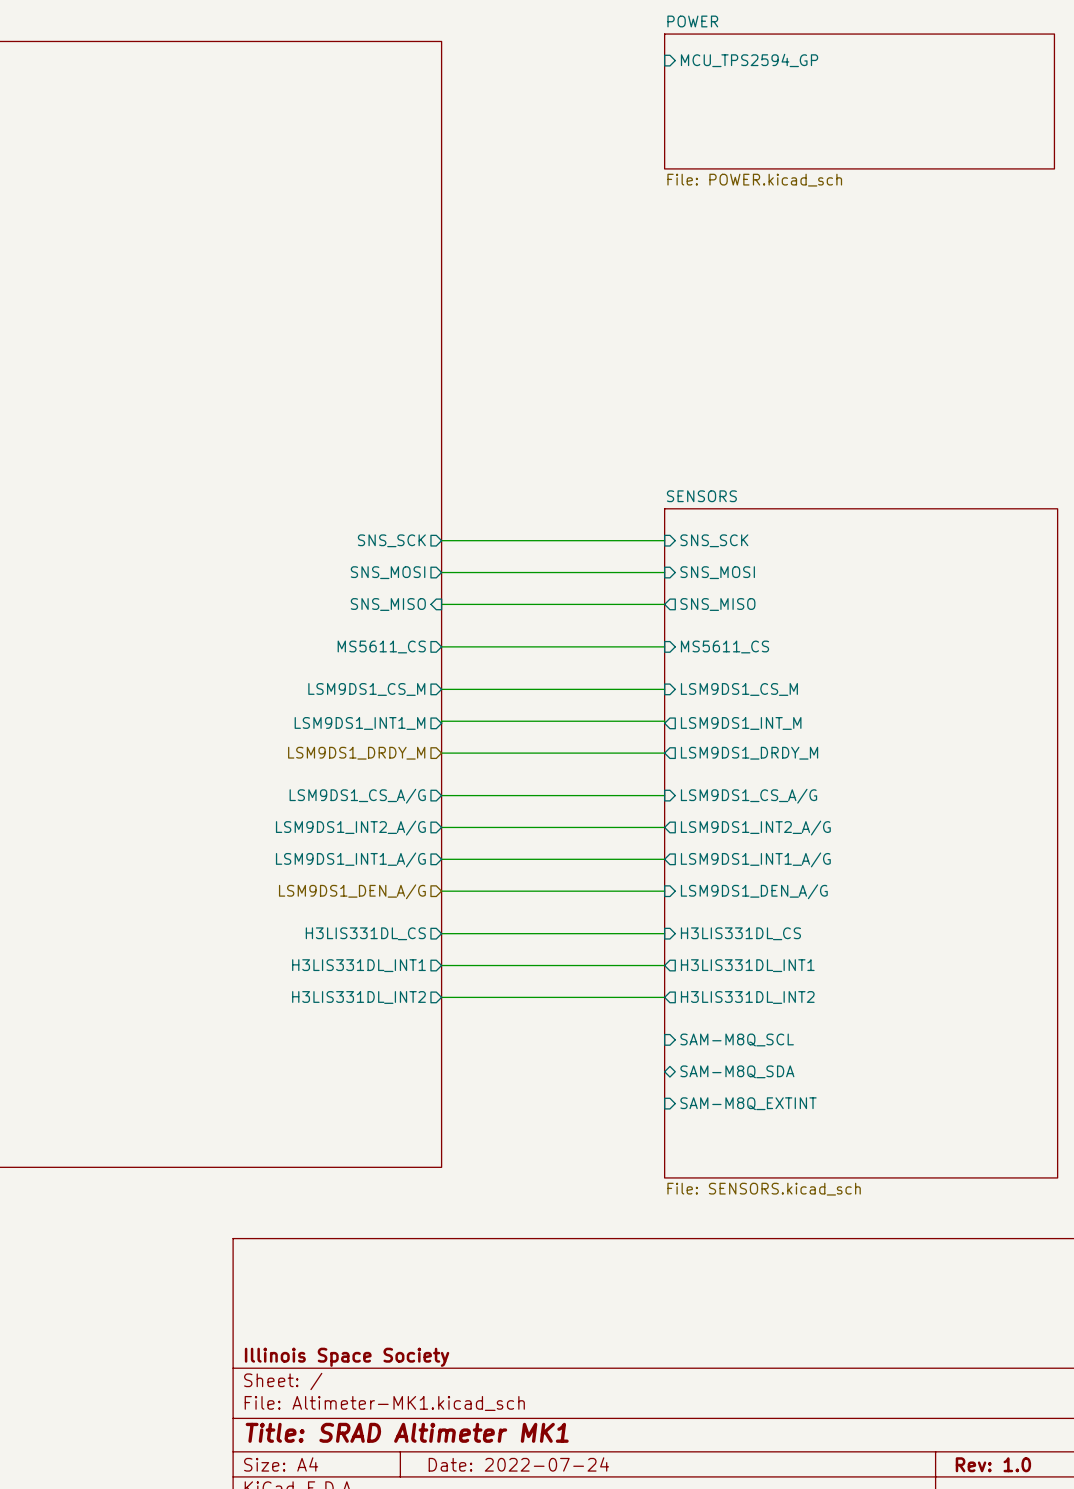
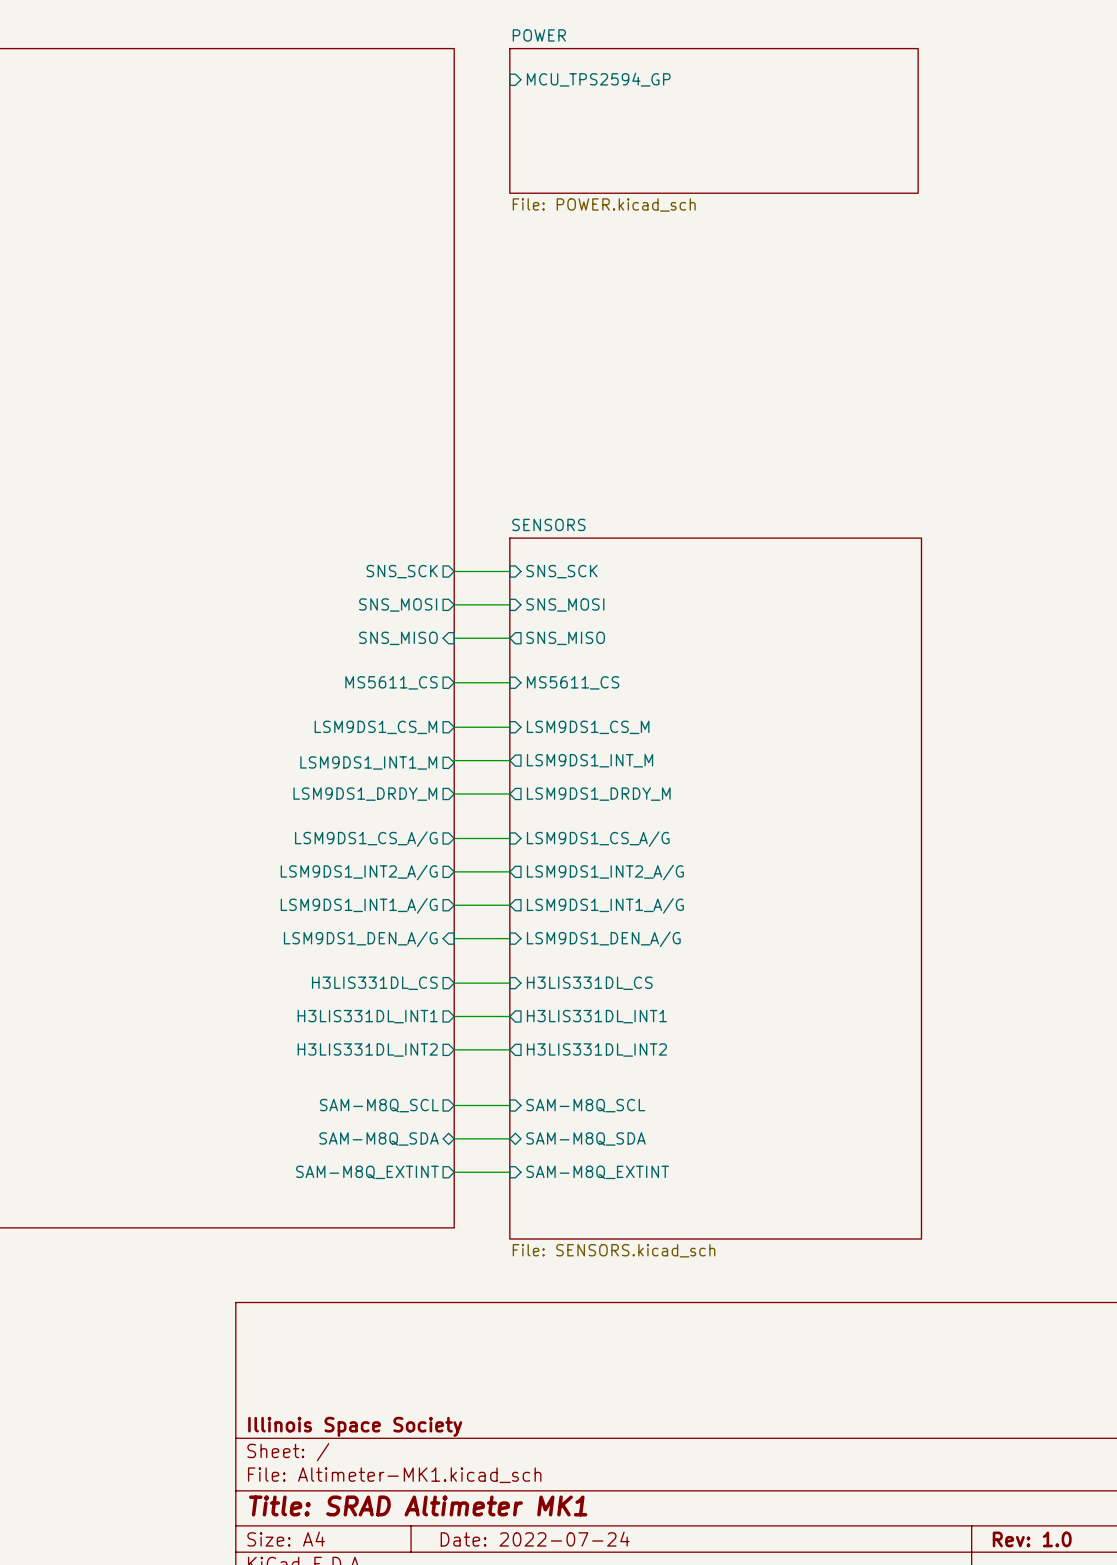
sheet pin position: MCU_TPS2594_GP (749, 60) -> MCU_TPS2594_GP (598, 79)
sheet POWER: File: POWER.kicad_sch (859, 101) -> none
sheet POWER: none -> File: POWER.kicad_sch (713, 120)
wire: (494, 540) (664, 540) -> none
sheet pin position: SNS_SCK (714, 540) -> SNS_SCK (561, 571)
wire: (494, 572) (664, 572) -> none
sheet pin position: SNS_MOSI (717, 572) -> SNS_MOSI (565, 604)
wire: (494, 604) (664, 604) -> none
sheet pin position: SNS_MISO (717, 604) -> SNS_MISO (565, 638)
wire: (494, 646) (664, 646) -> none
sheet pin position: MS5611_CS (724, 646) -> MS5611_CS (573, 682)
wire: (494, 689) (664, 689) -> none
sheet pin position: LSM9DS1_CS_M (739, 689) -> LSM9DS1_CS_M (588, 727)
wire: (494, 721) (664, 721) (664, 723) -> none
sheet pin position: LSM9DS1_INT_M (741, 723) -> LSM9DS1_INT_M (590, 760)
hierarchical label: LSM9DS1_DRDY_M (356, 753) -> none
sheet pin: none -> LSM9DS1_DRDY_M (365, 794)
wire: (494, 753) (664, 753) -> none
sheet pin: none -> LSM9DS1_DRDY_M (598, 794)
sheet pin: LSM9DS1_DRDY_M (749, 753) -> none
wire: (494, 795) (664, 795) -> none
sheet pin position: LSM9DS1_CS_A/G (749, 796) -> LSM9DS1_CS_A/G (598, 839)
wire: (494, 827) (664, 827) -> none
sheet pin position: LSM9DS1_INT2_A/G (755, 828) -> LSM9DS1_INT2_A/G (605, 872)
sheet SENSORS position: (861, 843) -> (715, 888)
wire: (494, 859) (664, 859) -> none
sheet pin position: LSM9DS1_INT1_A/G (755, 859) -> LSM9DS1_INT1_A/G (605, 905)
hierarchical label: LSM9DS1_DEN_A/G (352, 891) -> none
sheet pin: none -> LSM9DS1_DEN_A/G (360, 939)
wire: (494, 891) (664, 891) -> none
sheet pin position: LSM9DS1_DEN_A/G (754, 891) -> LSM9DS1_DEN_A/G (603, 939)
wire: (494, 933) (664, 933) -> none
sheet pin position: H3LIS331DL_CS (740, 933) -> H3LIS331DL_CS (589, 983)
wire: (494, 965) (664, 965) -> none
sheet pin position: H3LIS331DL_INT1 (747, 965) -> H3LIS331DL_INT1 (596, 1016)
wire: (494, 997) (664, 997) -> none
sheet pin position: H3LIS331DL_INT2 (747, 997) -> H3LIS331DL_INT2 (596, 1049)
sheet pin: SAM-M8Q_SCL (737, 1039) -> none
sheet pin: none -> SAM-M8Q_SCL (379, 1105)
wire: none -> (454, 1105) (509, 1105)
sheet pin: none -> SAM-M8Q_SCL (585, 1105)
sheet pin: SAM-M8Q_SDA (737, 1071) -> none
sheet pin: none -> SAM-M8Q_SDA (379, 1138)
wire: none -> (454, 1138) (509, 1138)
sheet pin: none -> SAM-M8Q_SDA (586, 1138)
sheet pin: SAM-M8Q_EXTINT (748, 1103) -> none
sheet pin: none -> SAM-M8Q_EXTINT (367, 1172)
wire: none -> (454, 1172) (509, 1172)
sheet pin: none -> SAM-M8Q_EXTINT (597, 1172)

